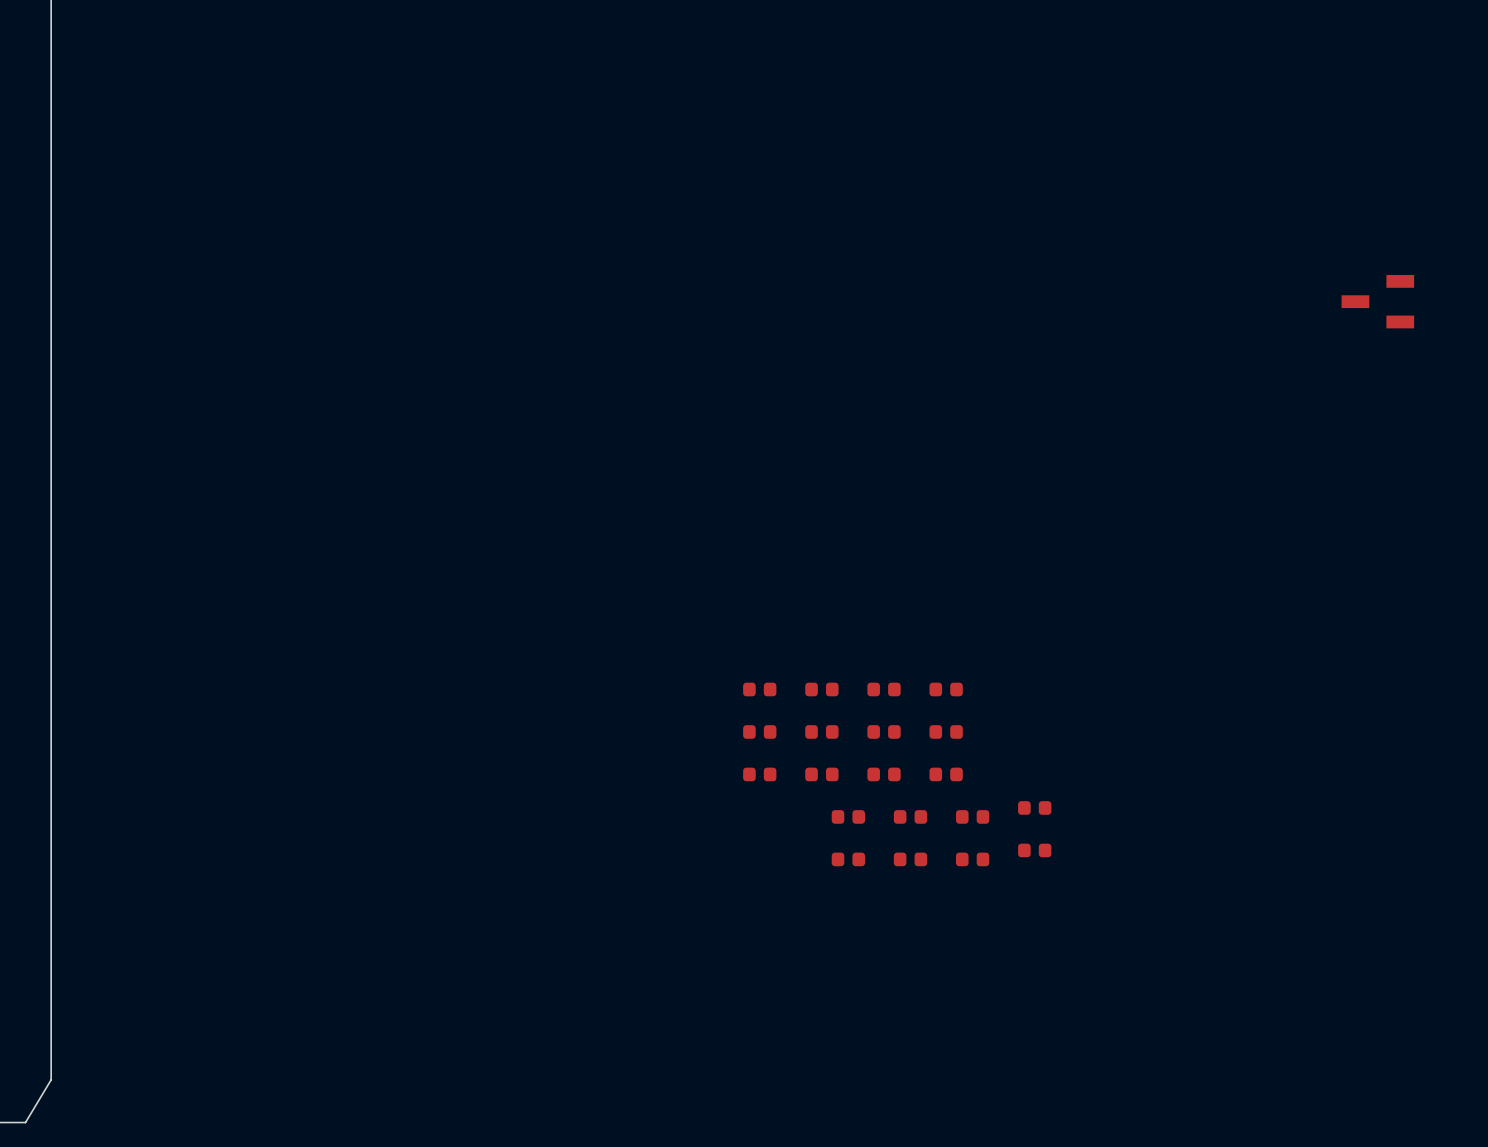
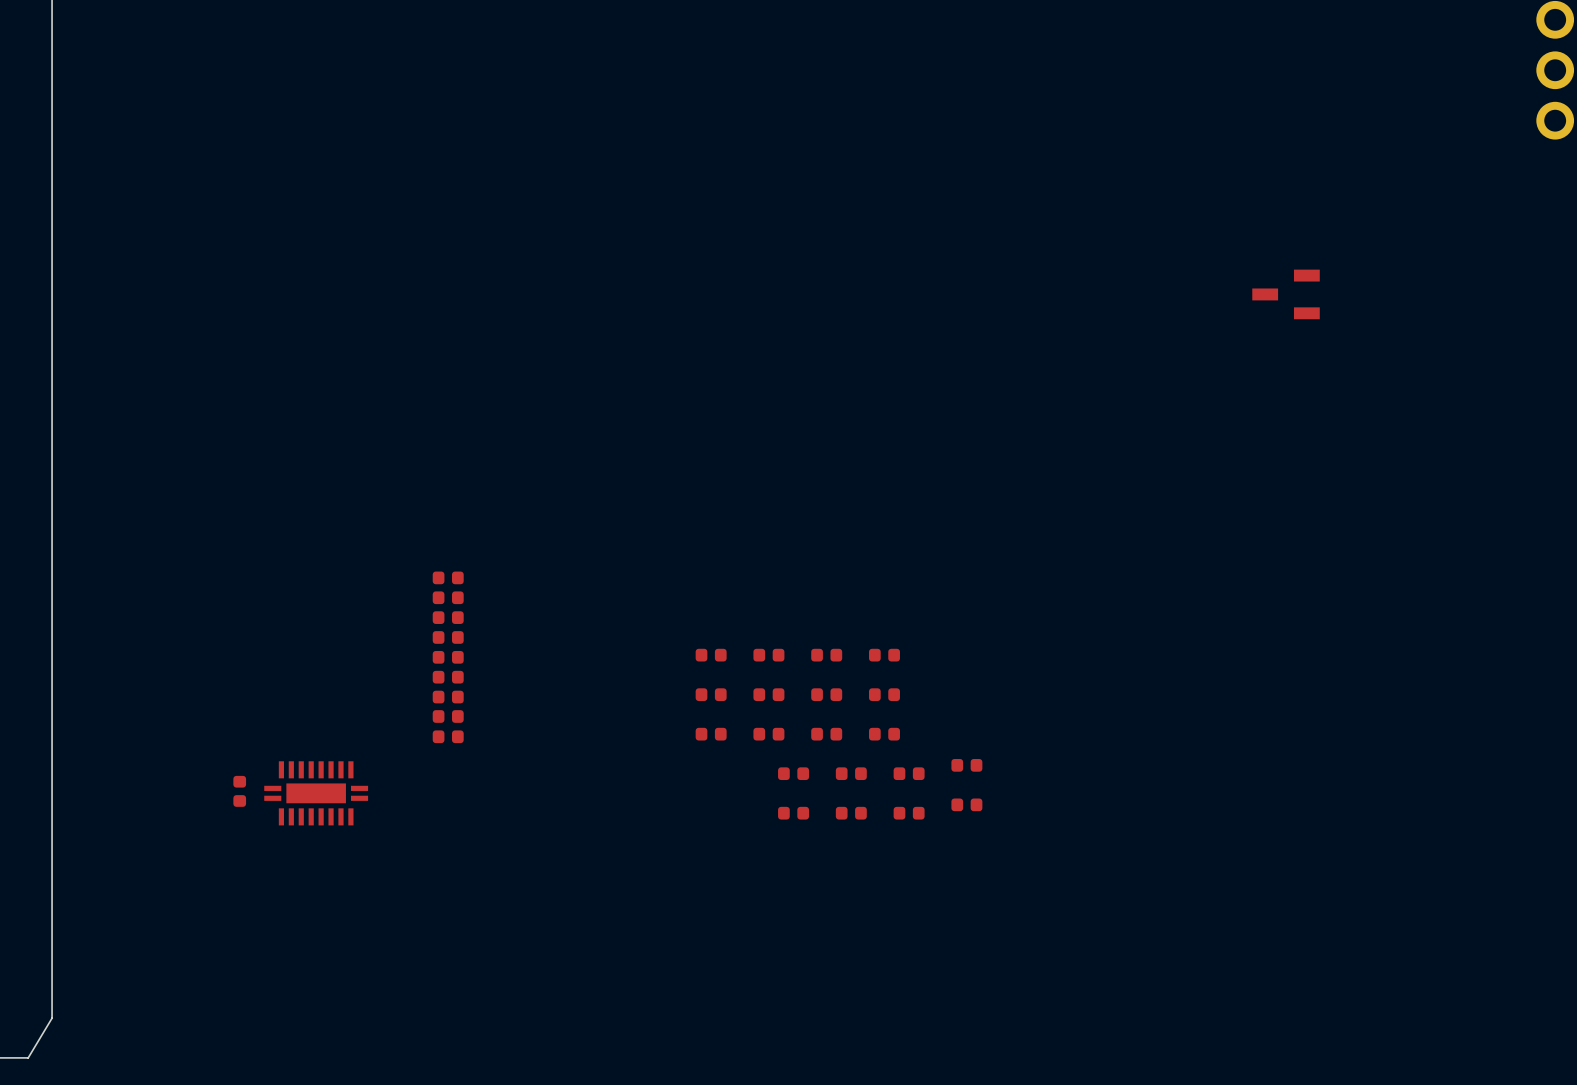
part: none -> (448, 577)
part: none -> (448, 597)
part: none -> (448, 617)
part: none -> (448, 637)
part: none -> (448, 657)
part: none -> (448, 677)
part: none -> (448, 697)
part: none -> (448, 716)
part: none -> (448, 736)
part: none -> (239, 791)
part: none -> (316, 793)

